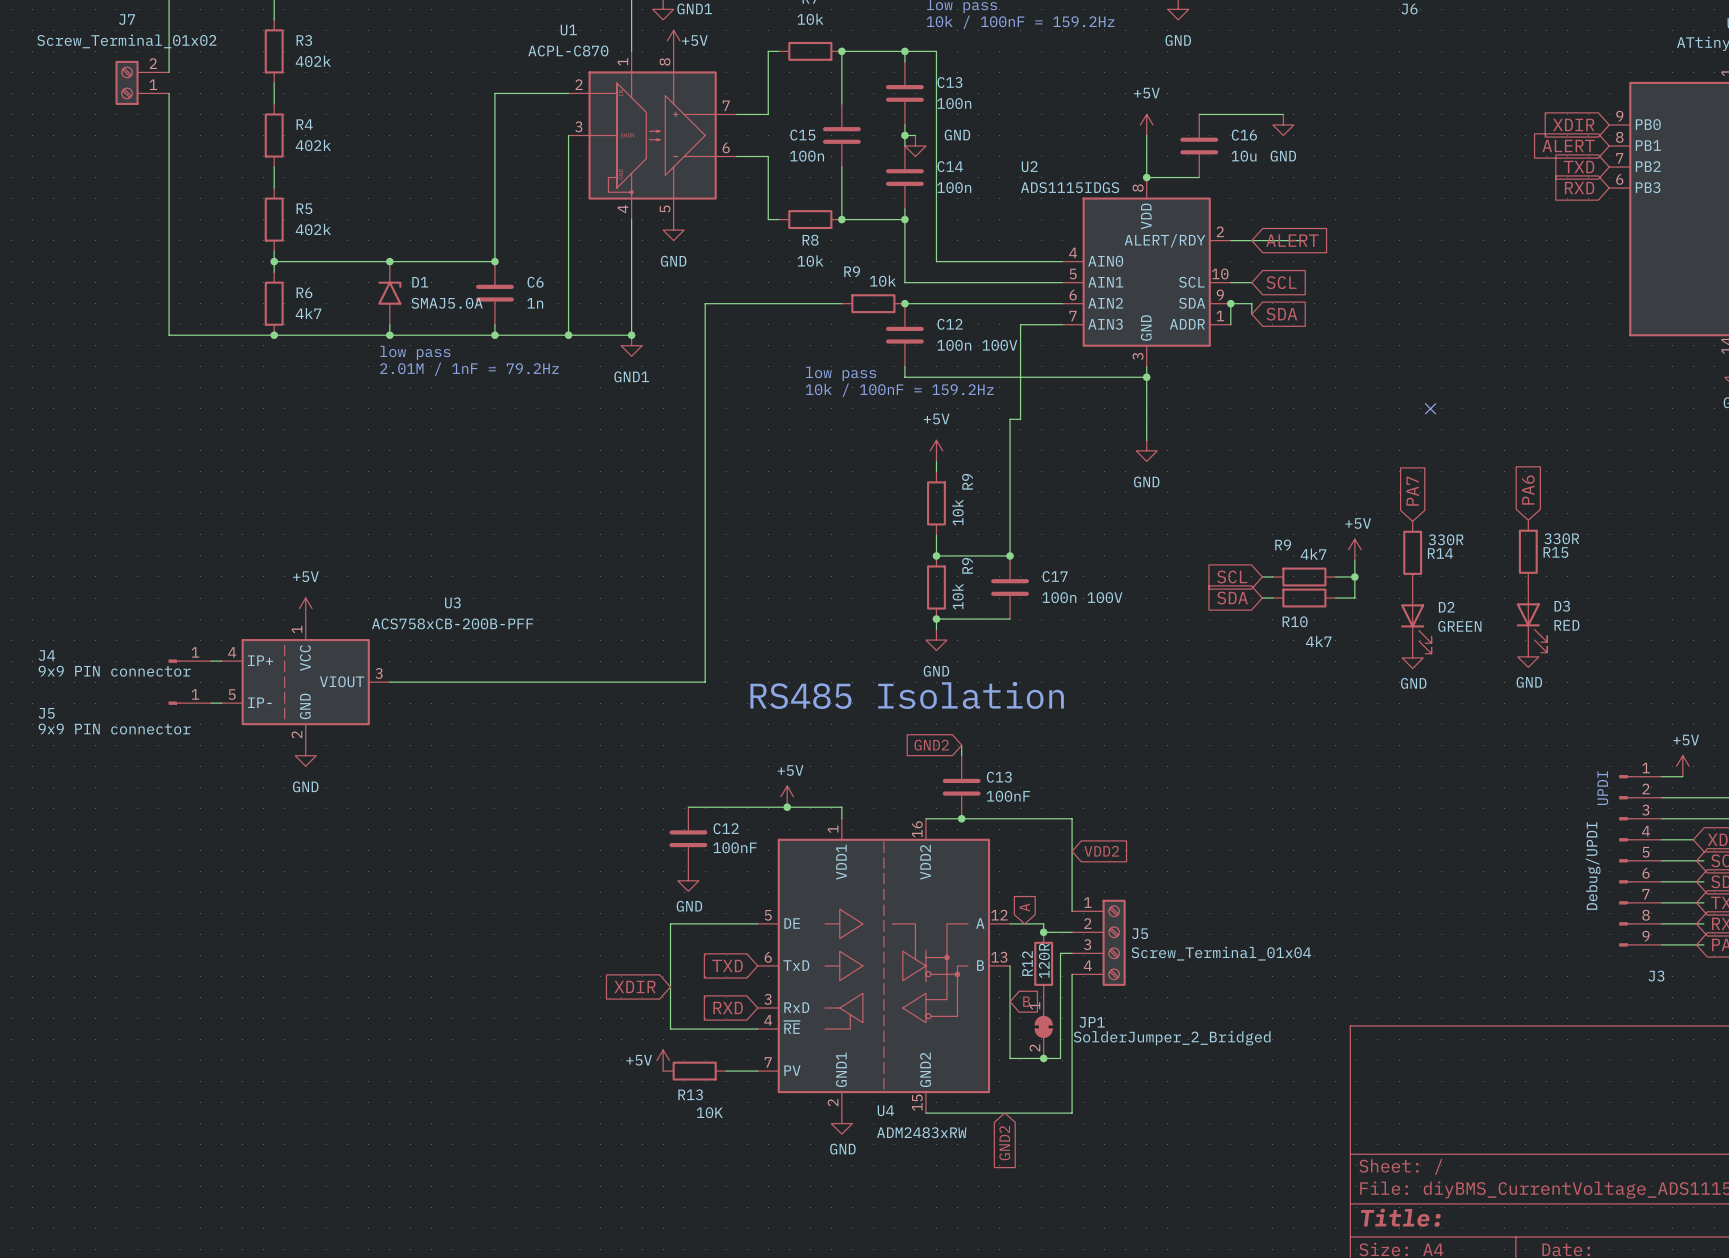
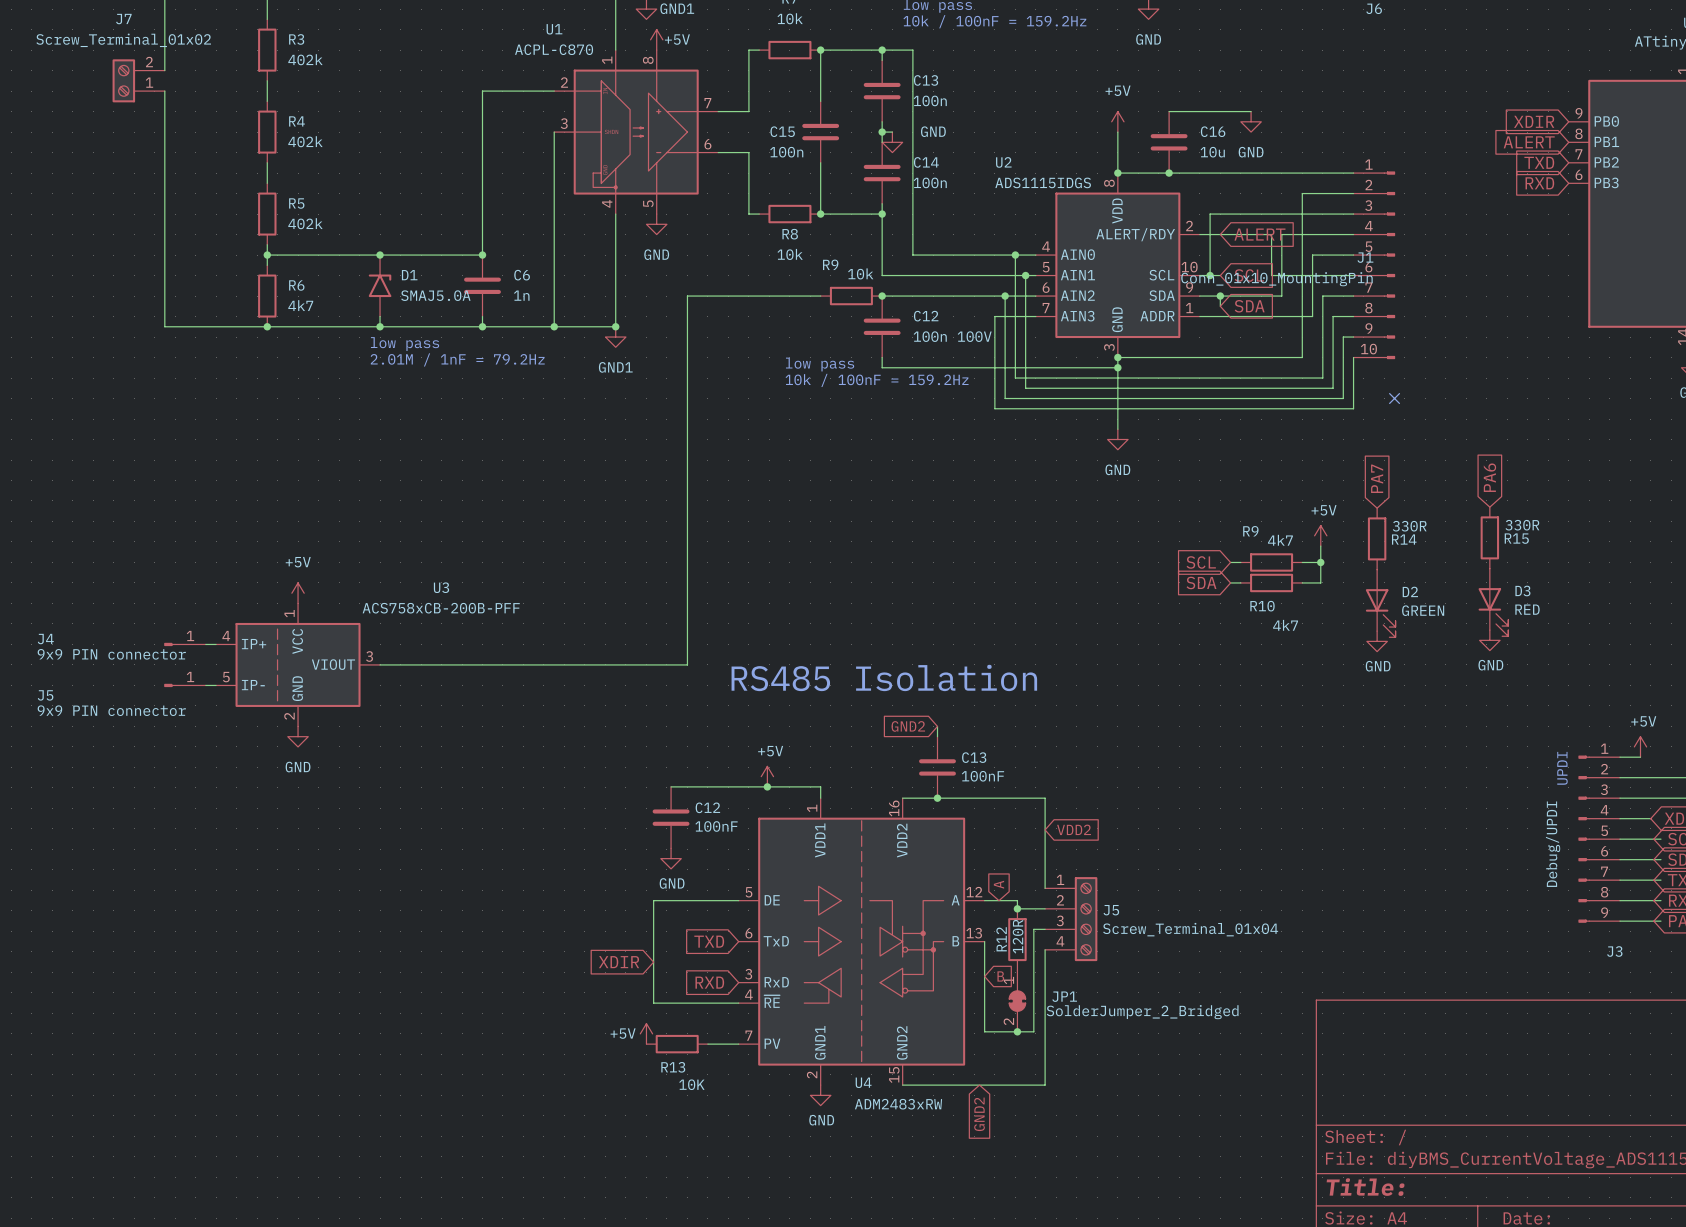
wire: none -> (1169, 173) (1353, 173)
junction: none -> (1169, 173)
wire: none -> (1353, 193) (1302, 193) (1302, 357) (1117, 357)
wire: none -> (1353, 214) (1210, 214) (1210, 275)
wire: none -> (1271, 234) (1271, 275) (1353, 275)
wire: none -> (1353, 234) (1281, 234) (1281, 296) (1220, 296)
wire: none -> (1015, 255) (1015, 378) (1322, 378) (1322, 296) (1353, 296)
junction: none -> (1015, 255)
J1: none -> Conn_01x10_MountingPin (1374, 265)
wire: none -> (1025, 275) (1025, 388) (1333, 388) (1333, 316) (1353, 316)
junction: none -> (1025, 275)
junction: none -> (1210, 275)
wire: none -> (1005, 296) (1005, 398) (1343, 398) (1343, 337) (1353, 337)
junction: none -> (1005, 296)
wire: (1230, 303) (1230, 324) -> (1353, 255) (1312, 255) (1312, 316) (1199, 316)
junction: (1230, 303) -> none
junction: none -> (1220, 296)
junction: none -> (1117, 357)
wire: (1020, 419) (1010, 419) (1010, 555) (936, 555) (936, 534) -> (994, 408) (1353, 408) (1353, 357)
power symbol: +5V (936, 450) -> none
wire: (936, 461) (936, 471) -> none
R9: 10k (936, 503) -> none
junction: (936, 555) -> none
junction: (1010, 555) -> none
R9: 10k (936, 587) -> none
C17: 100n 100V (1010, 587) -> none
junction: (936, 619) -> none
wire: (1010, 619) (936, 619) (936, 629) -> none
power symbol: GND (936, 640) -> none

